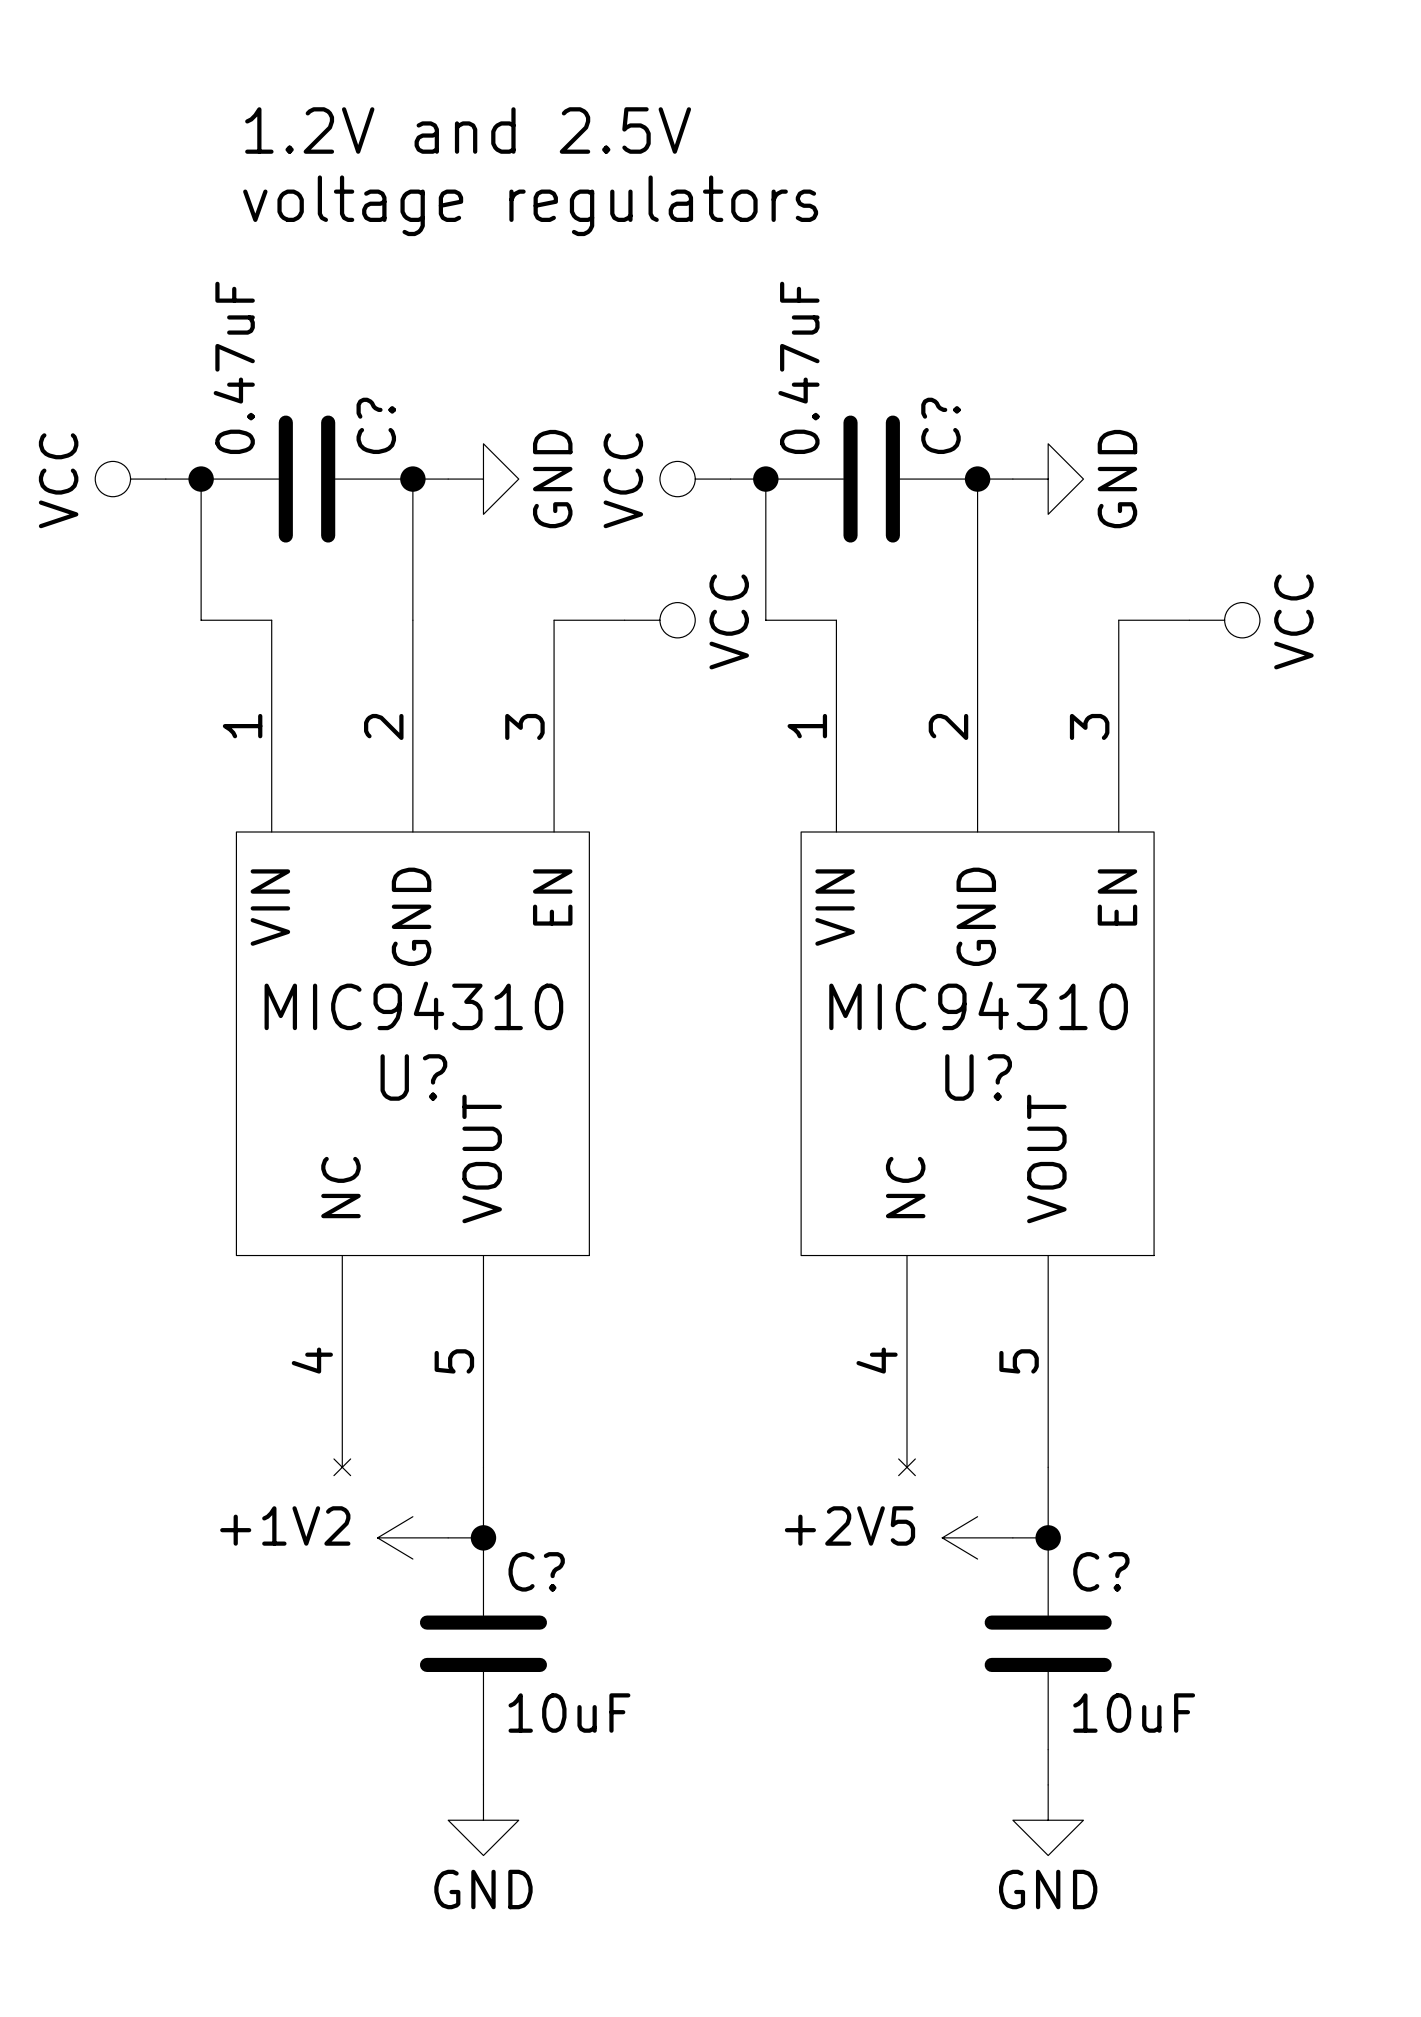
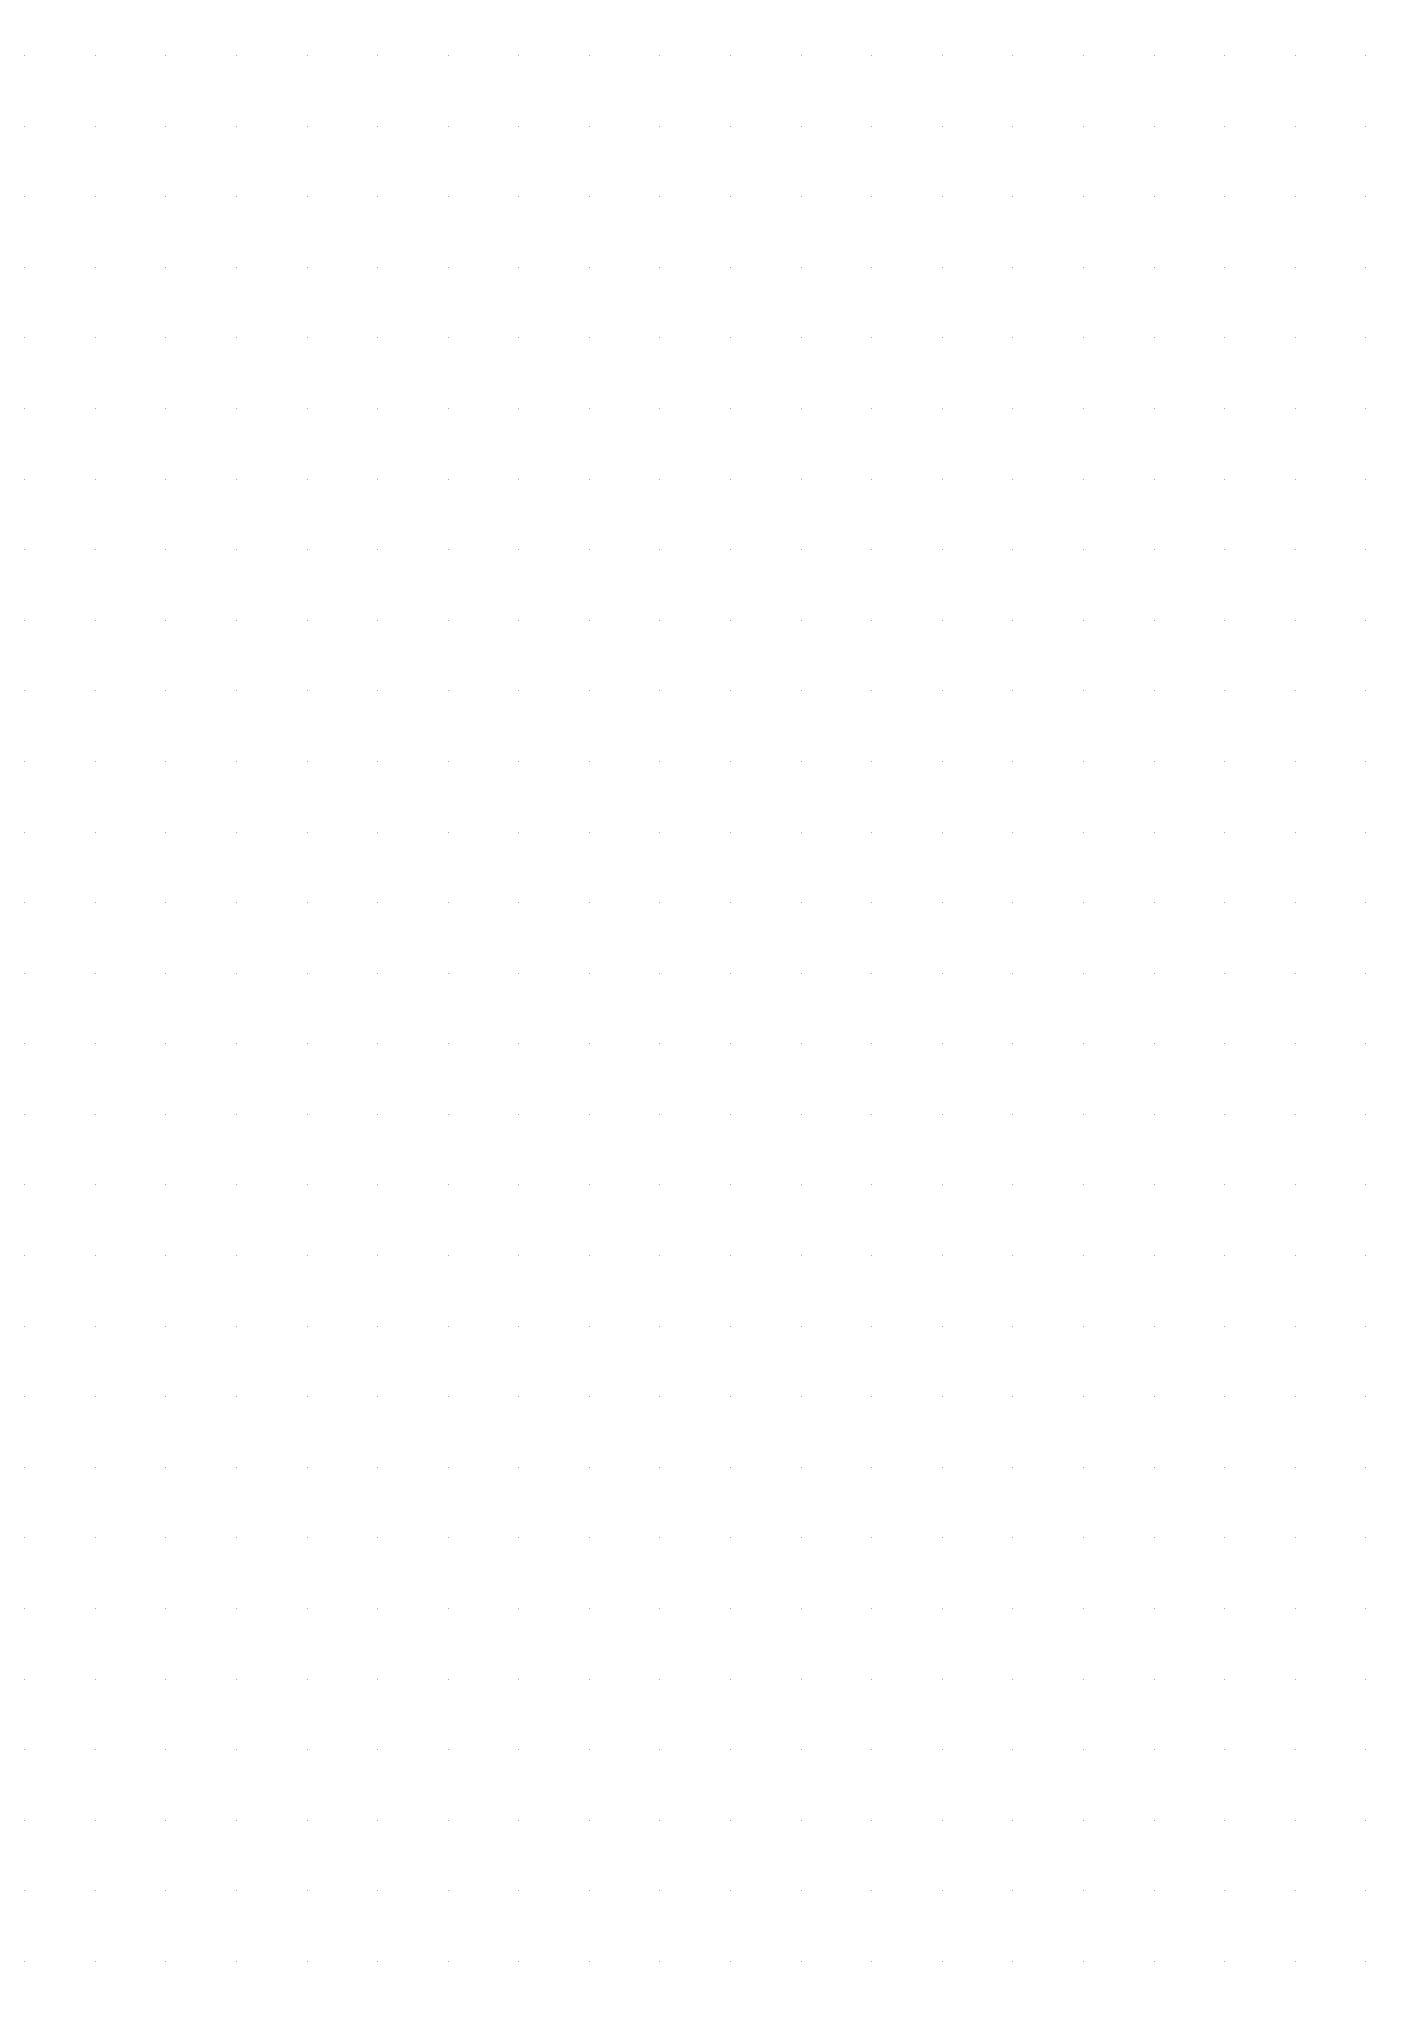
text: 1.2V and 2.5V (468, 130) -> none
text: voltage regulators (530, 205) -> none
power symbol: VCC (130, 479) -> none
wire: (165, 479) (201, 479) (201, 620) (271, 620) -> none
junction: (201, 479) -> none
C?: 0.47uF (307, 479) -> none
junction: (412, 479) -> none
wire: (448, 479) (412, 479) (412, 620) -> none
power symbol: GND (483, 479) -> none
power symbol: VCC (695, 479) -> none
wire: (730, 479) (765, 479) (765, 620) (836, 620) -> none
junction: (765, 479) -> none
C?: 0.47uF (871, 479) -> none
junction: (977, 479) -> none
wire: (1012, 479) (977, 479) (977, 620) -> none
power symbol: GND (1048, 479) -> none
wire: (554, 620) (624, 620) -> none
power symbol: VCC (659, 620) -> none
wire: (1118, 620) (1189, 620) -> none
power symbol: VCC (1224, 620) -> none
U?: MIC94310 (412, 1047) -> none
U?: MIC94310 (977, 1047) -> none
wire: (483, 1467) (483, 1537) (448, 1537) -> none
wire: (1048, 1467) (1048, 1537) (1012, 1537) -> none
power symbol: +1V2 (412, 1537) -> none
junction: (483, 1537) -> none
power symbol: +2V5 (977, 1537) -> none
junction: (1048, 1537) -> none
C?: 10uF (483, 1643) -> none
C?: 10uF (1048, 1643) -> none
wire: (483, 1749) (483, 1784) -> none
wire: (1048, 1749) (1048, 1784) -> none
power symbol: GND (483, 1820) -> none
power symbol: GND (1048, 1820) -> none

